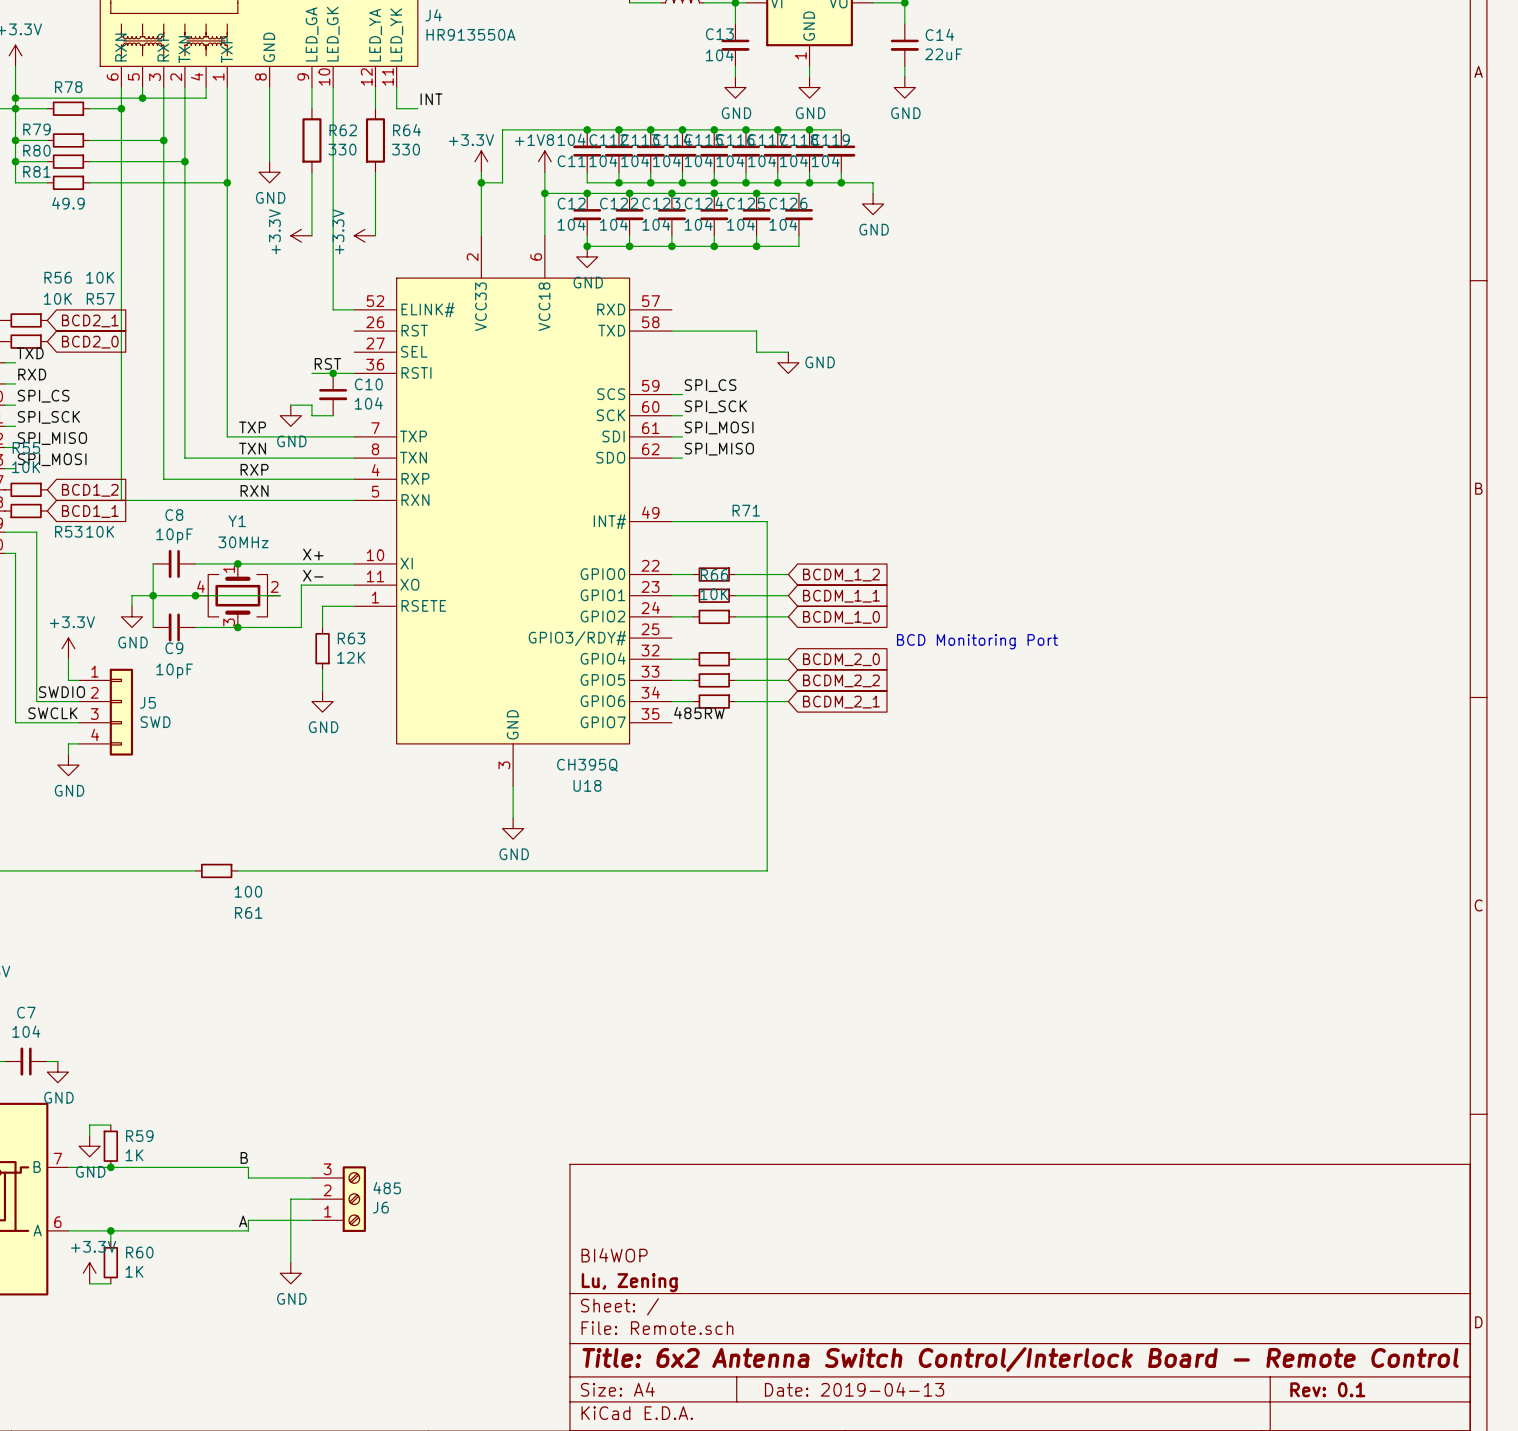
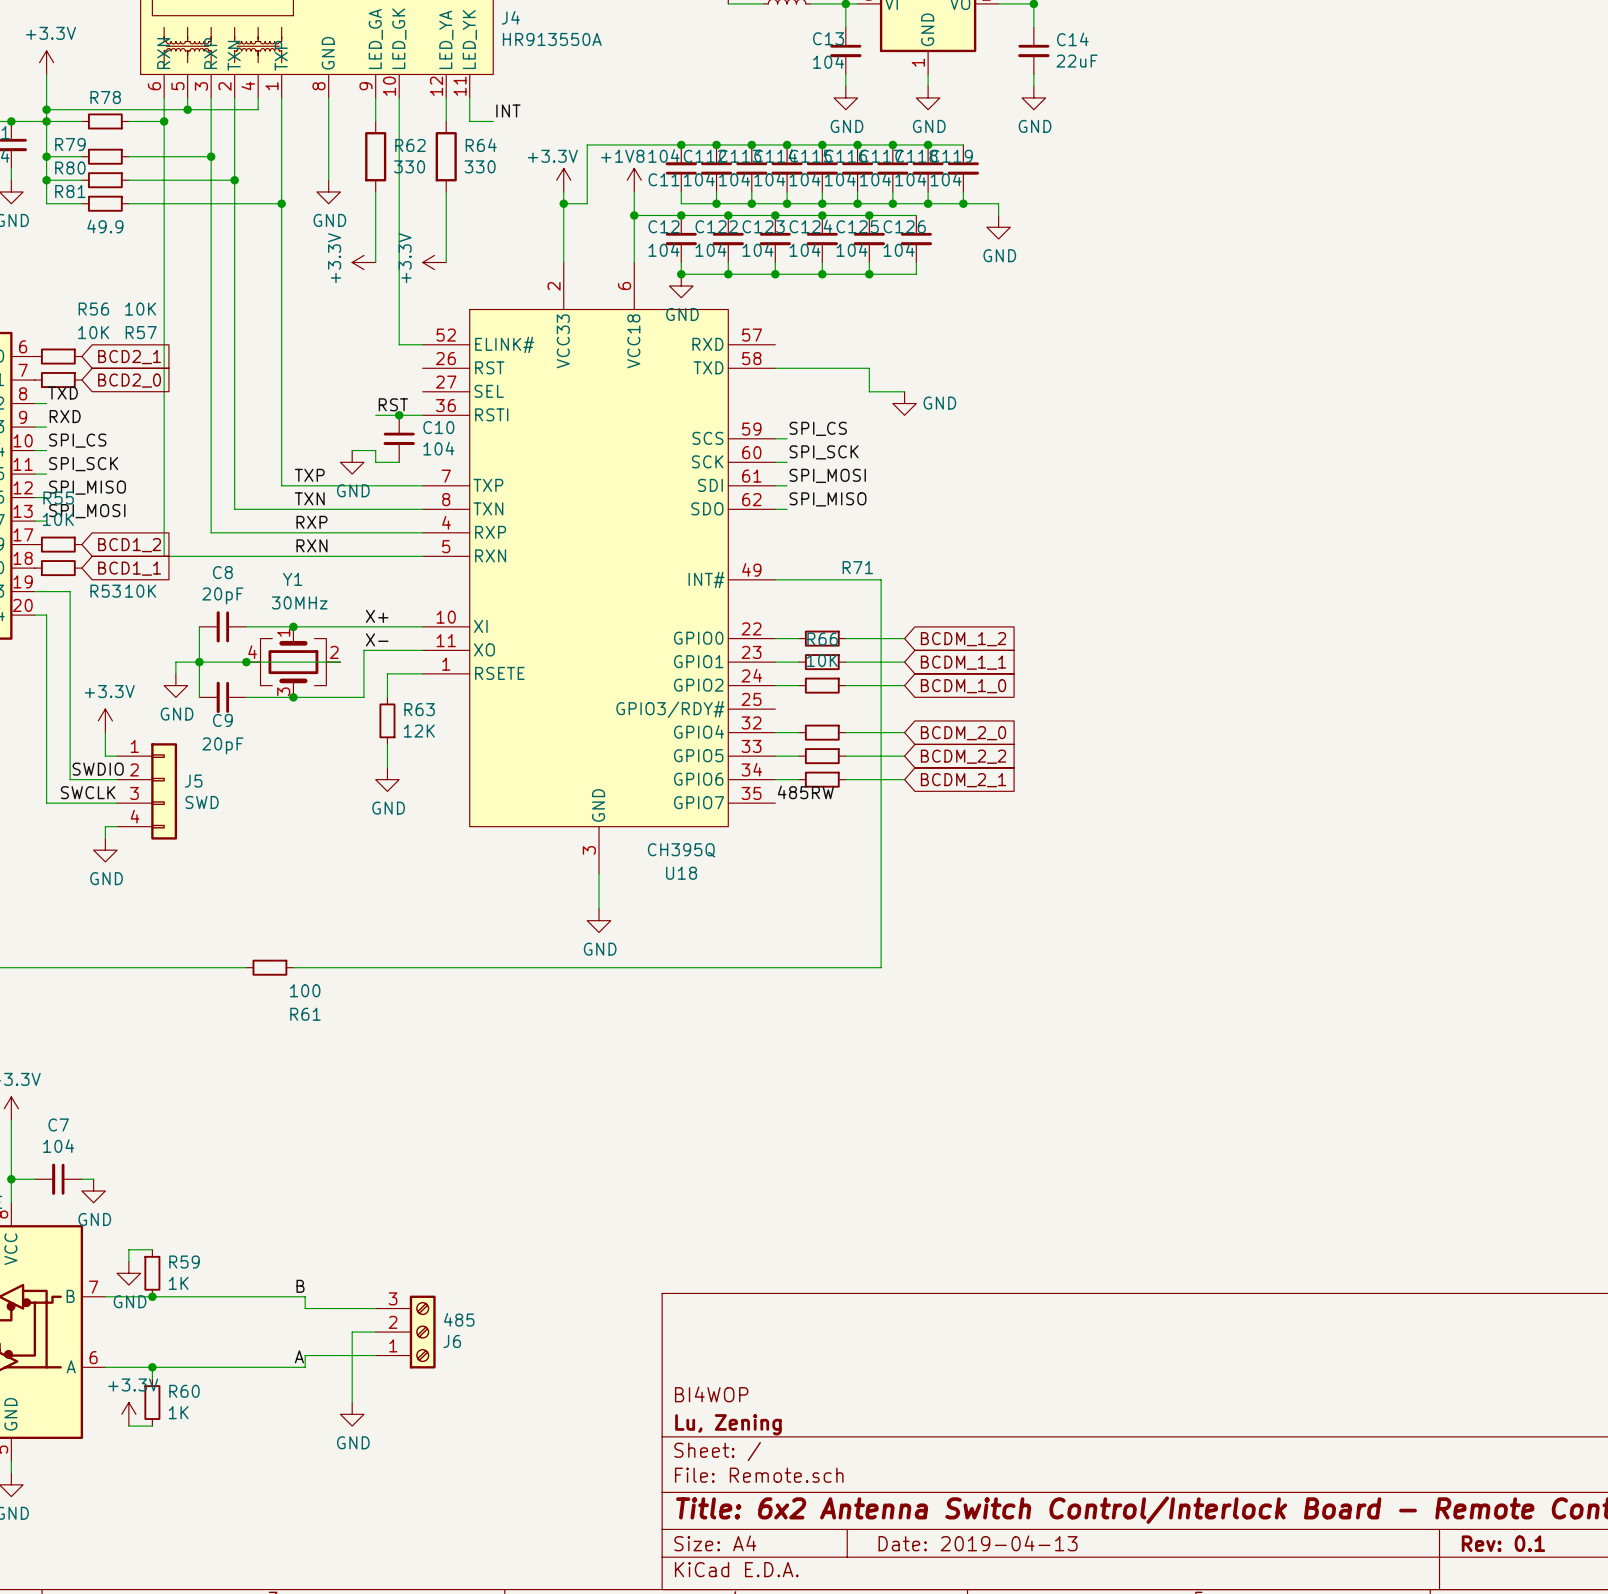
C8 value: 10pF (174, 536) -> 20pF (222, 595)
text: BCD Monitoring Port (977, 641) -> none
C9 value: 10pF (174, 671) -> 20pF (222, 745)

